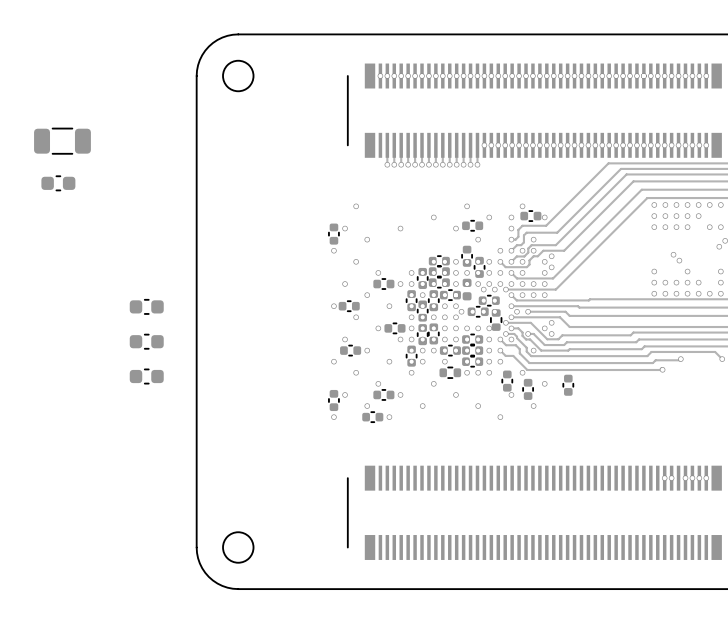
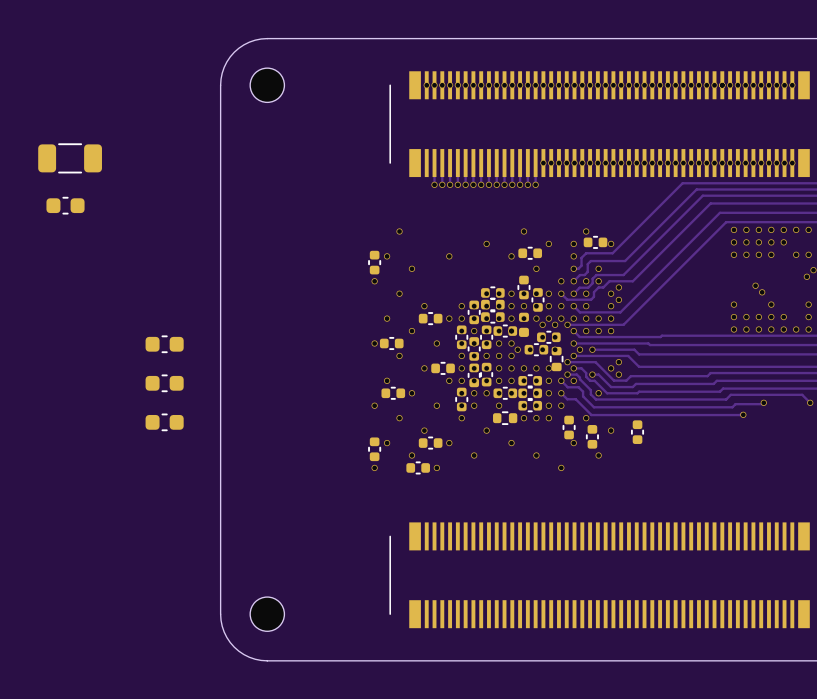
via: (664, 478) -> none
via: (671, 478) -> none
via: (685, 478) -> none
via: (692, 478) -> none
via: (699, 478) -> none
via: (706, 478) -> none

